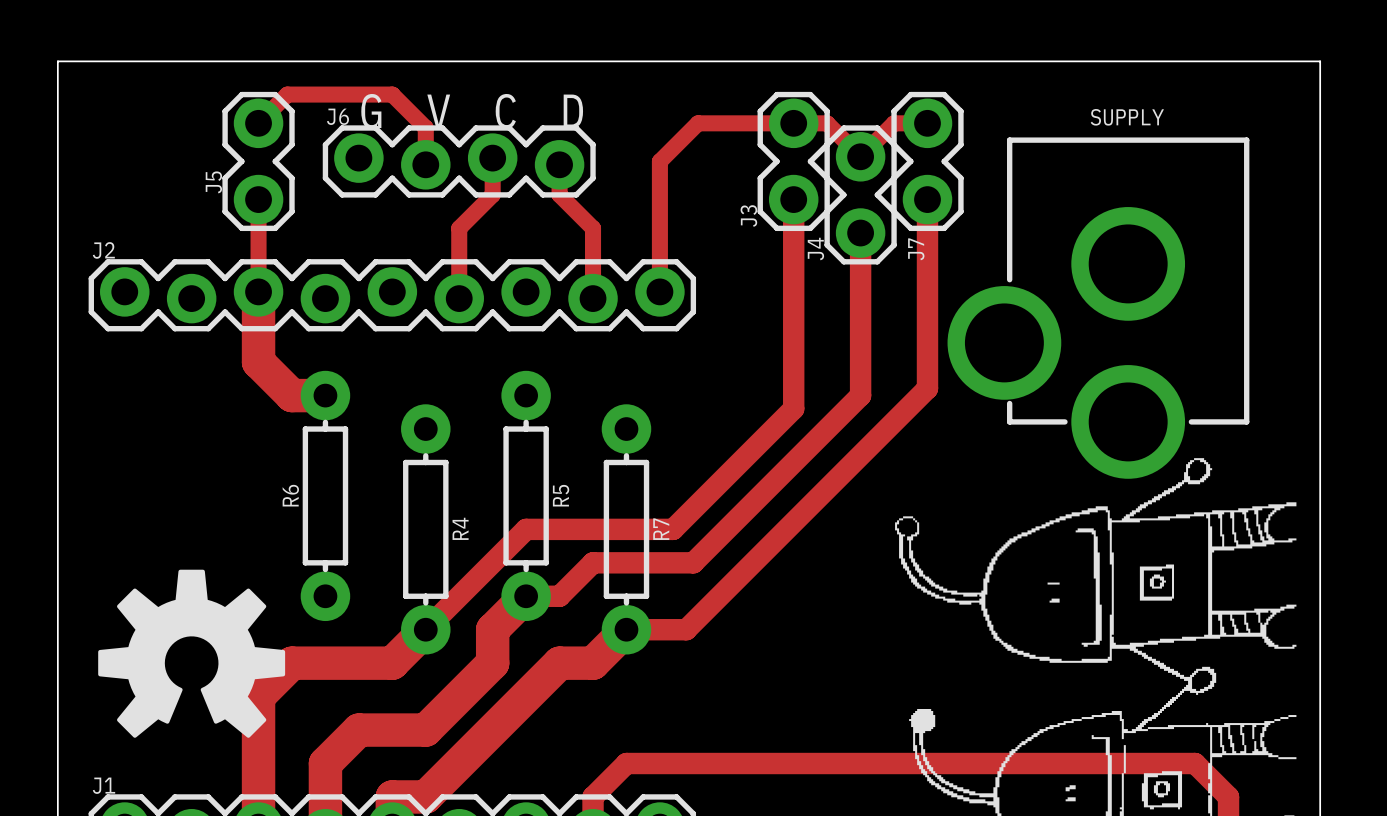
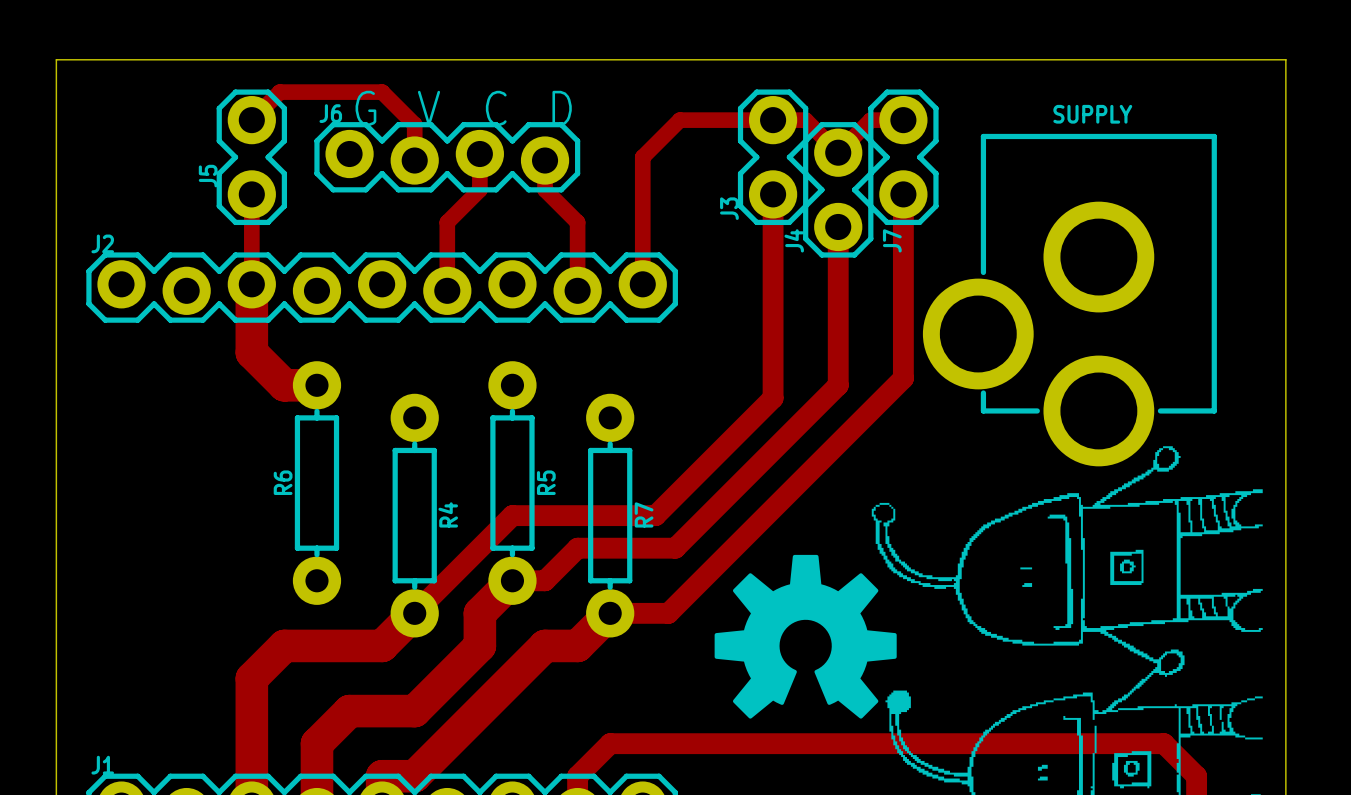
drawing position: (191, 653) -> (805, 636)

